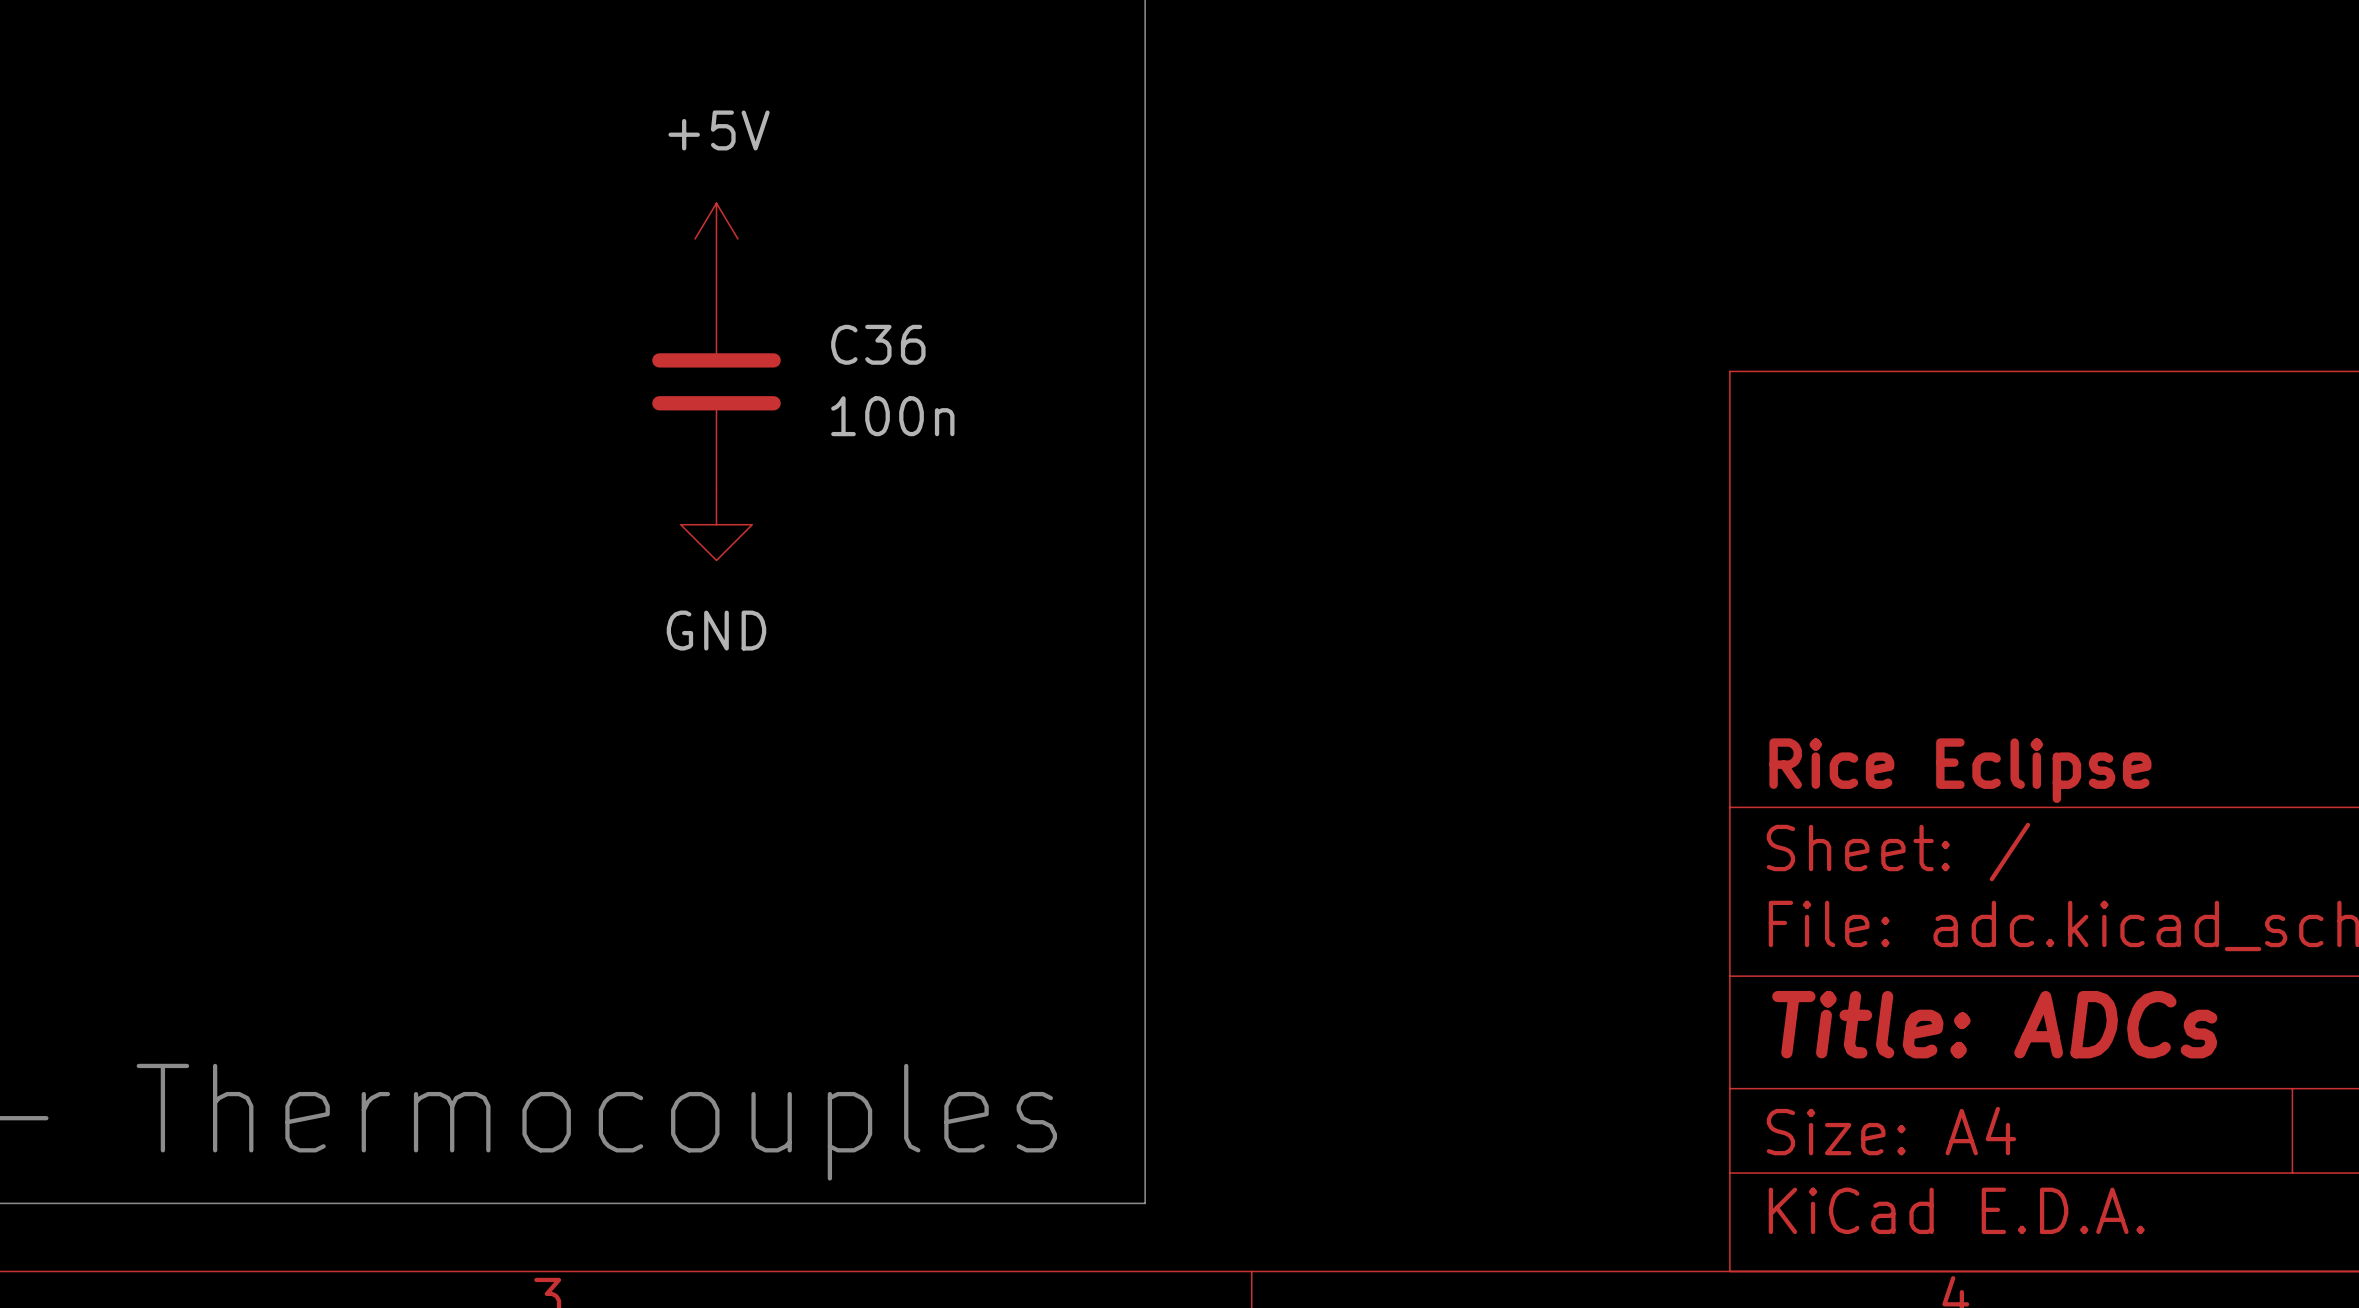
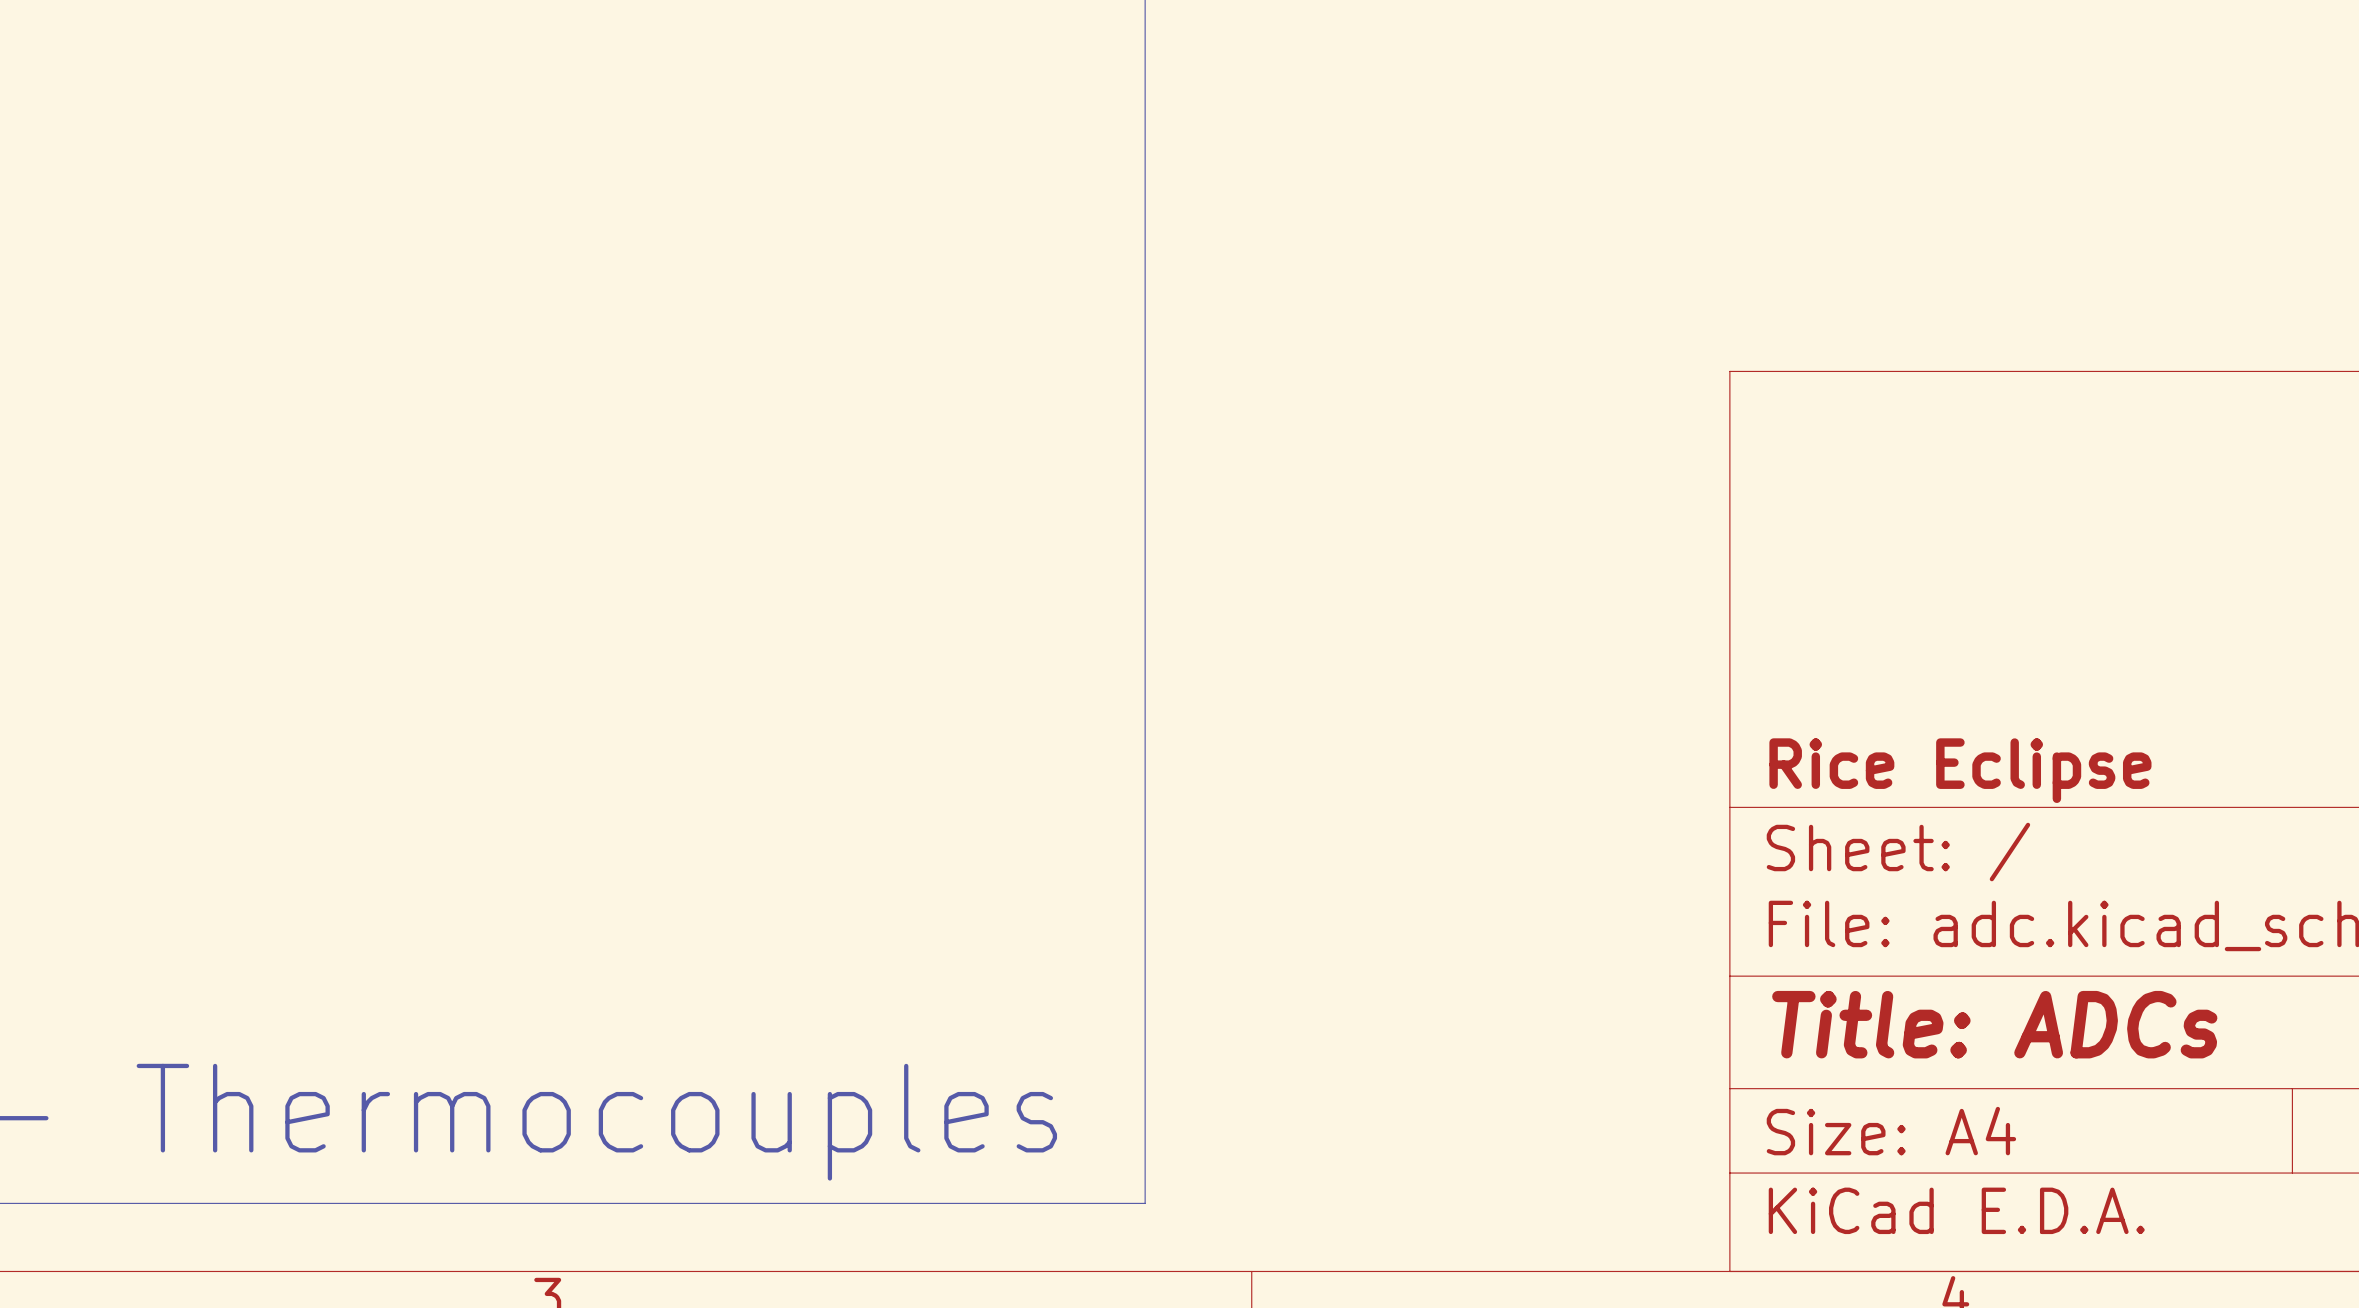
power symbol: +5V (716, 238) -> none
C36: 100n (716, 381) -> none
power symbol: GND (716, 524) -> none

